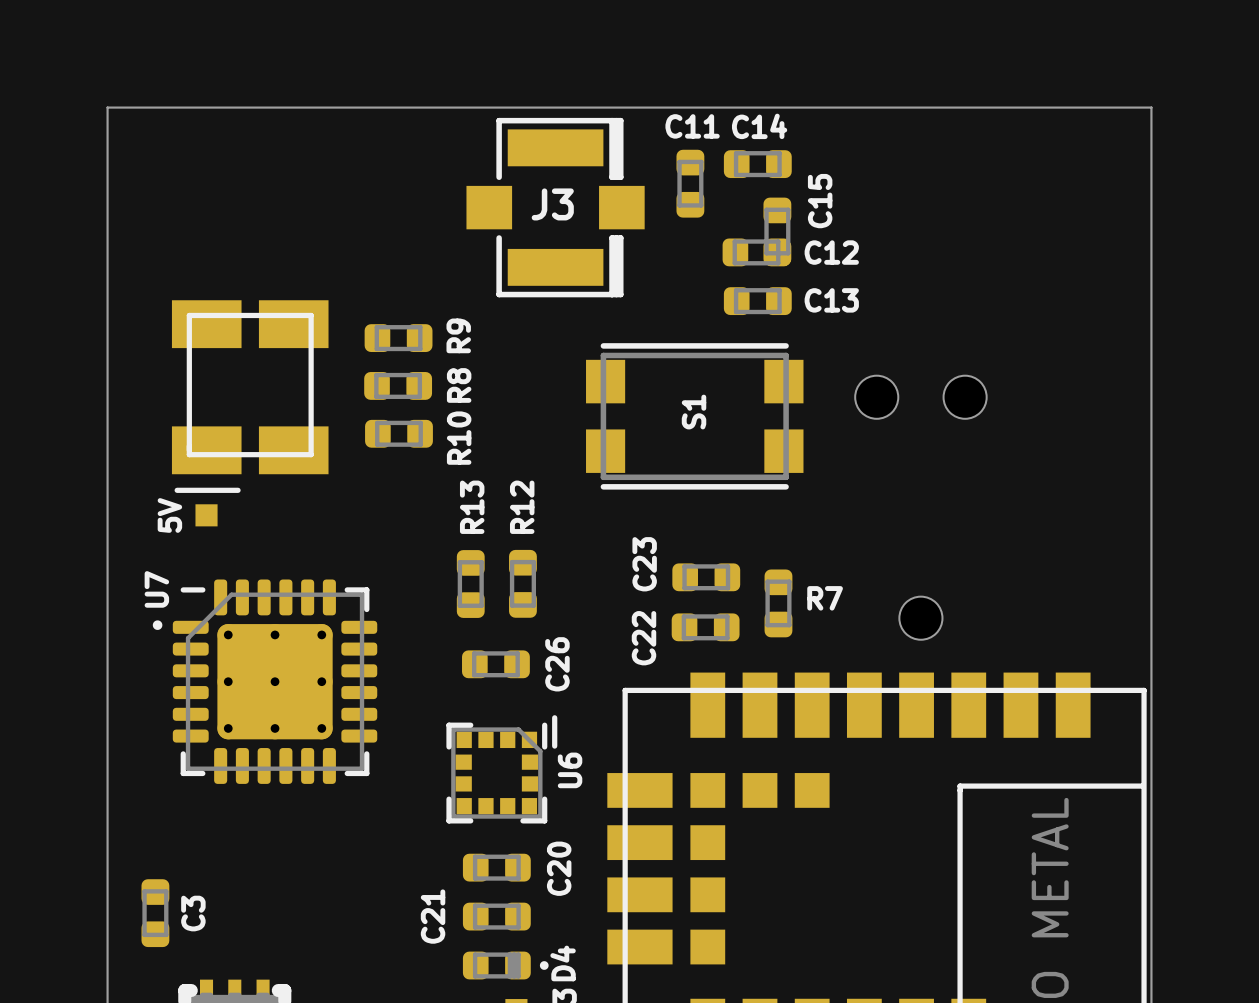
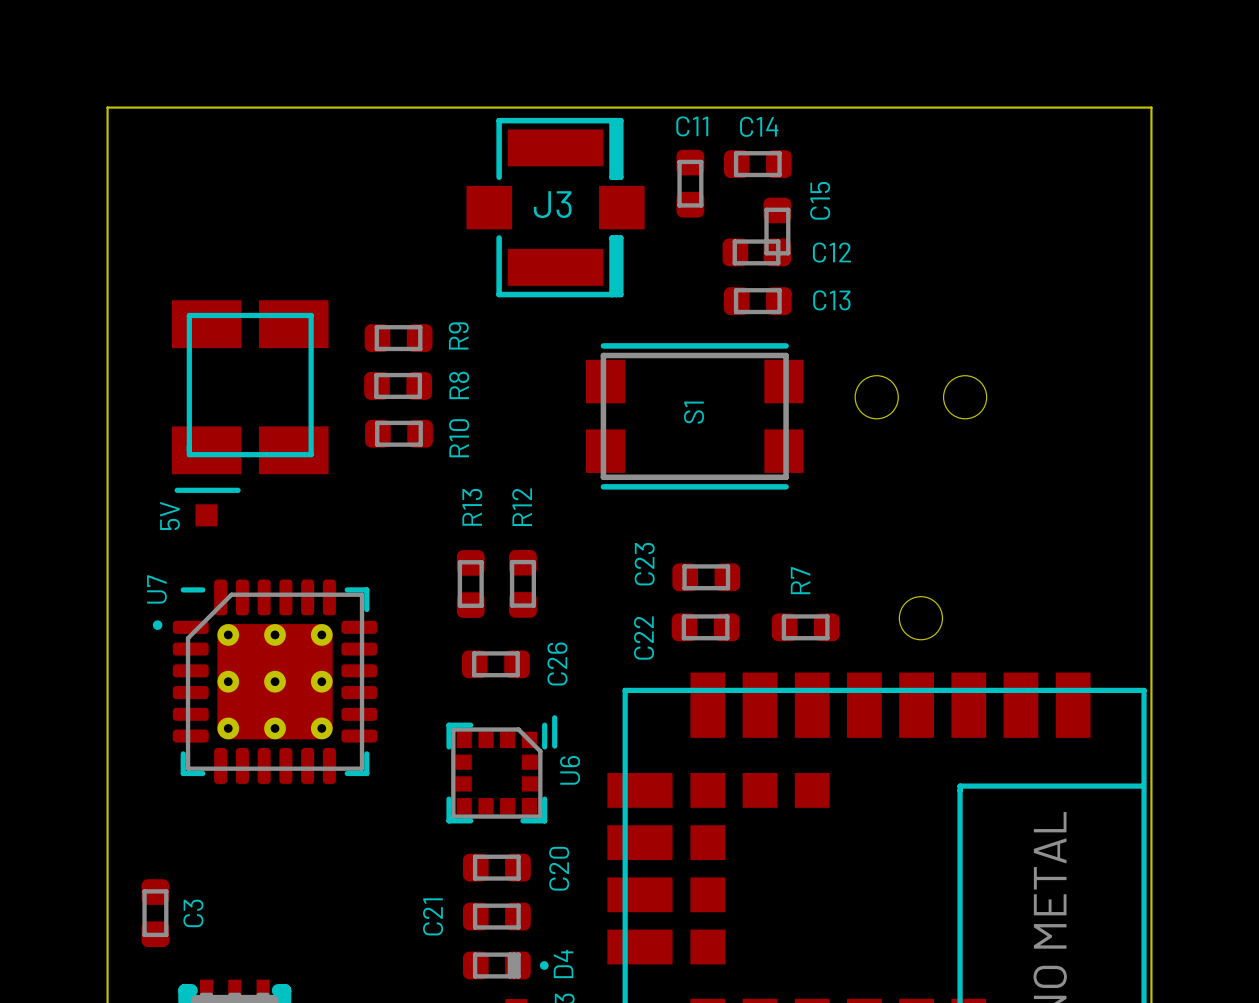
R7 rotation: 0° (778, 603) -> 90° clockwise (805, 627)

